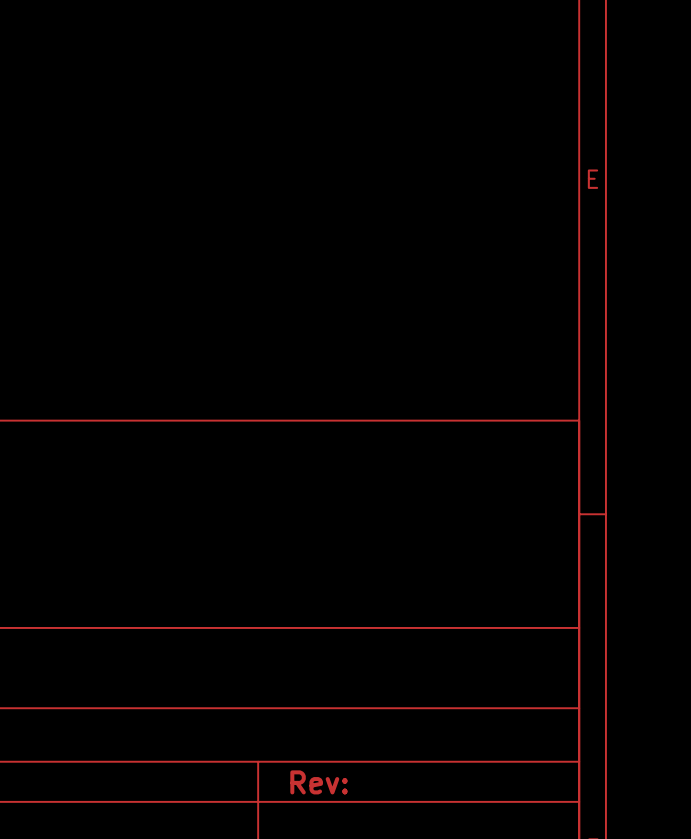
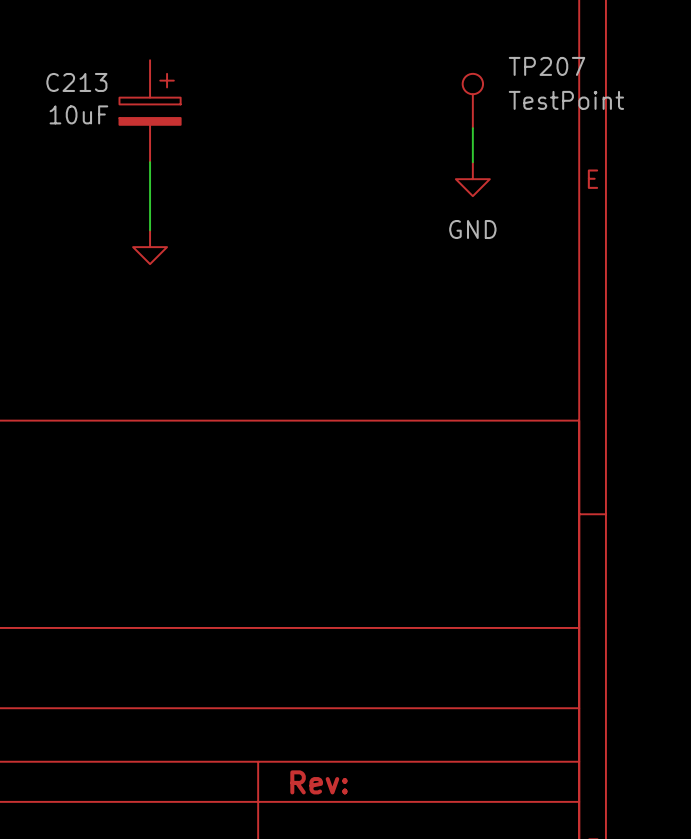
TP207: none -> TestPoint (472, 101)
C213: none -> 10uF (150, 111)
wire: none -> (472, 128) (472, 162)
wire: none -> (150, 162) (150, 230)
power symbol: none -> GND (472, 179)
power symbol: none -> (150, 247)

